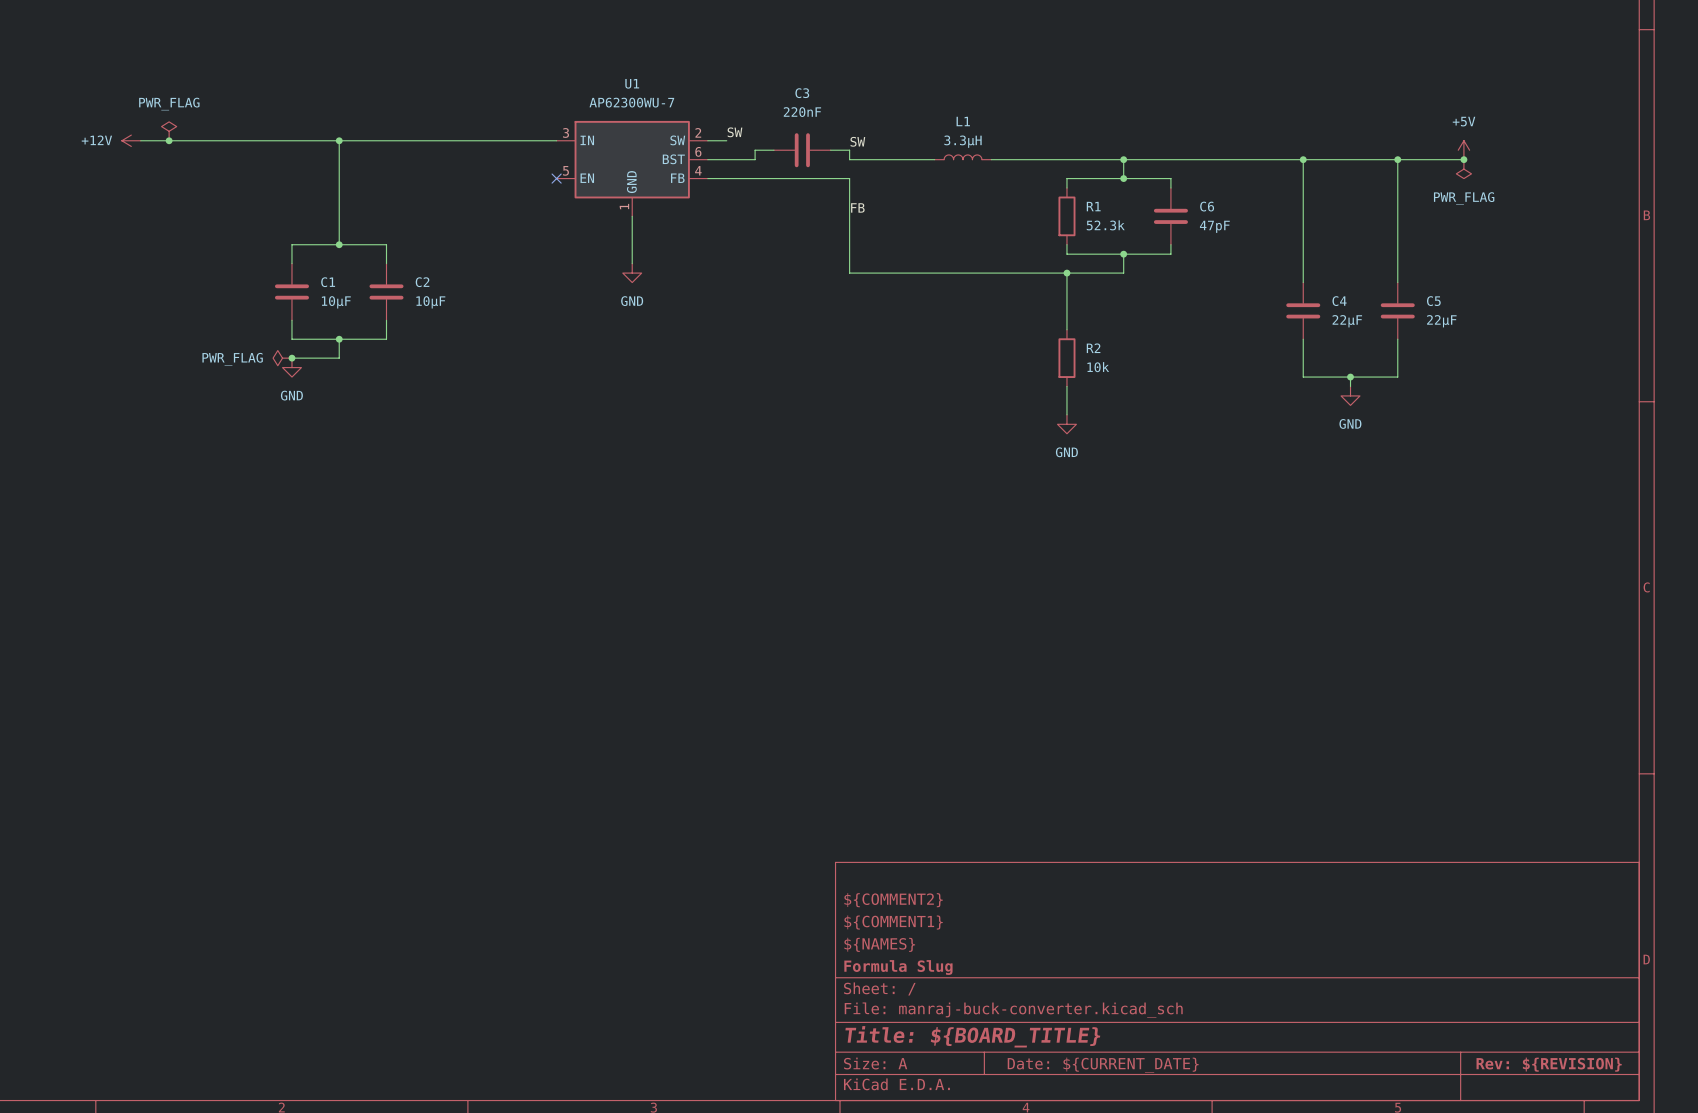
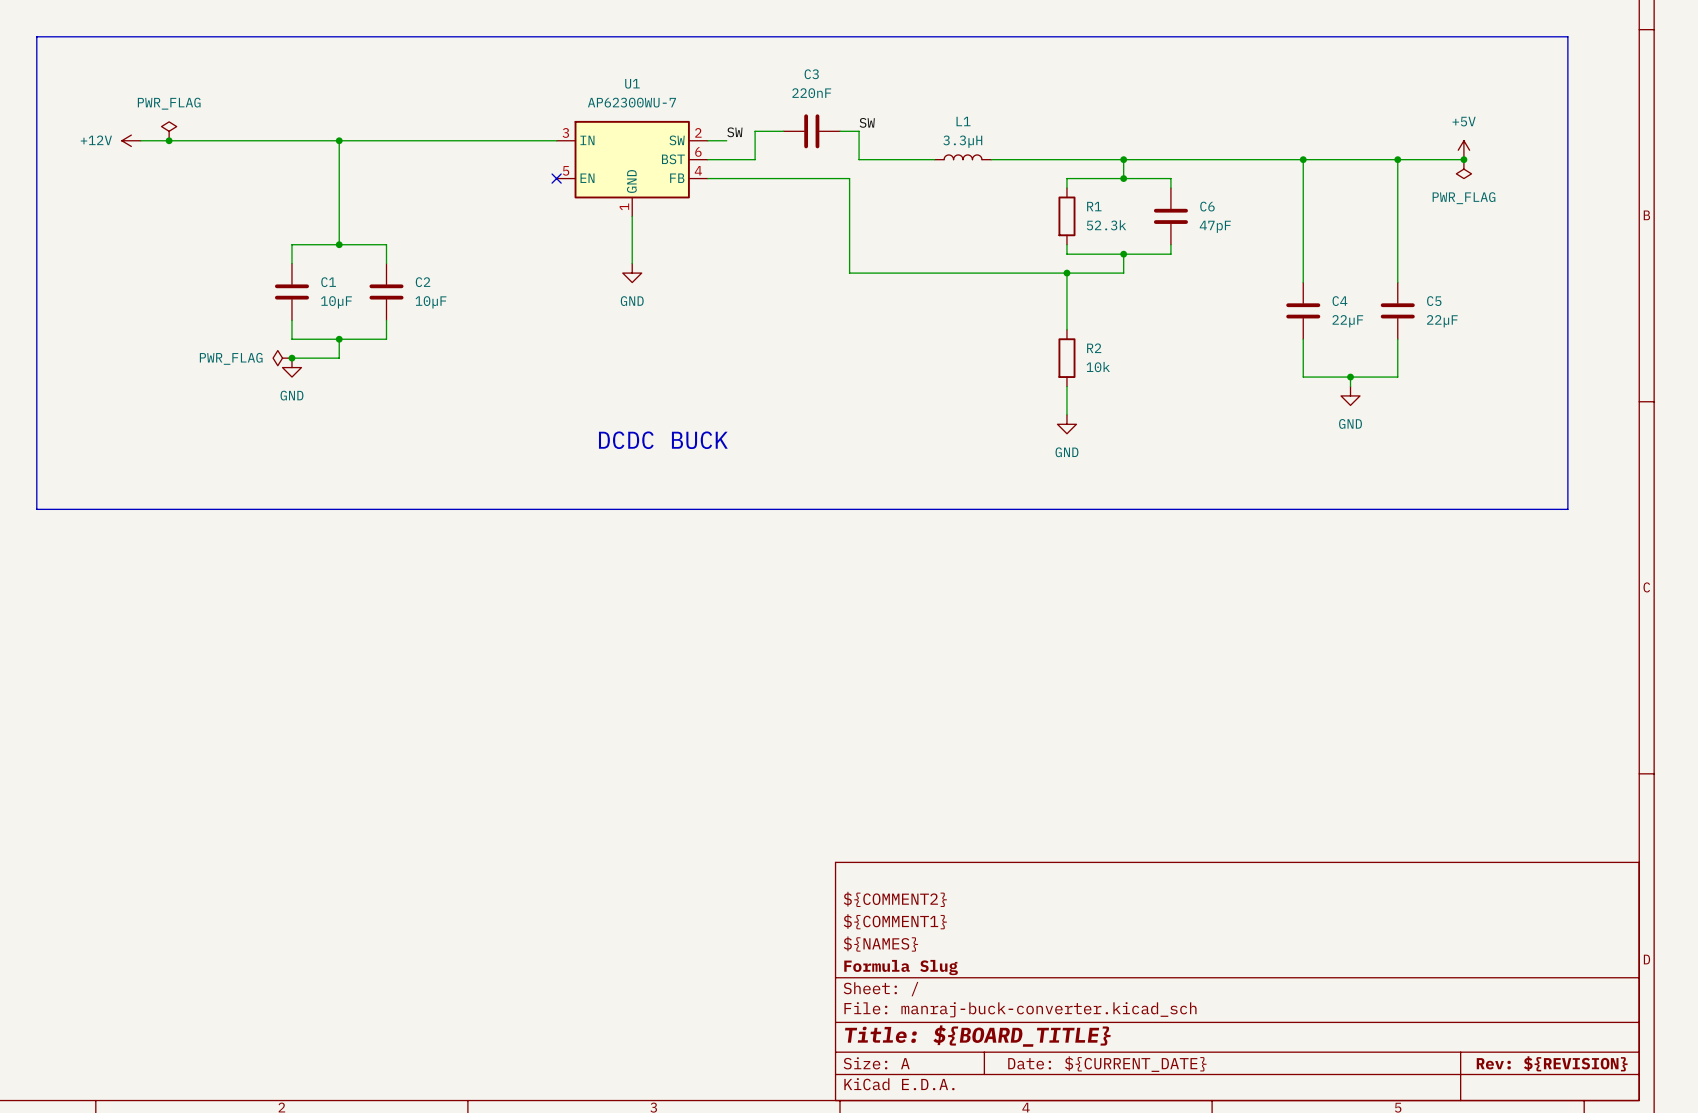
line: none -> (36, 36) (1567, 36) (1567, 509) (36, 509) (36, 36)
label position: SW (857, 141) -> SW (867, 122)
wire: (755, 150) (773, 150) -> (755, 150) (755, 131) (783, 131)
C3 position: (802, 150) -> (811, 131)
wire: (830, 150) (849, 150) (849, 159) (859, 159) -> (840, 131) (859, 131) (859, 159)
label: FB (857, 207) -> none
text: none -> DCDC BUCK (663, 440)

